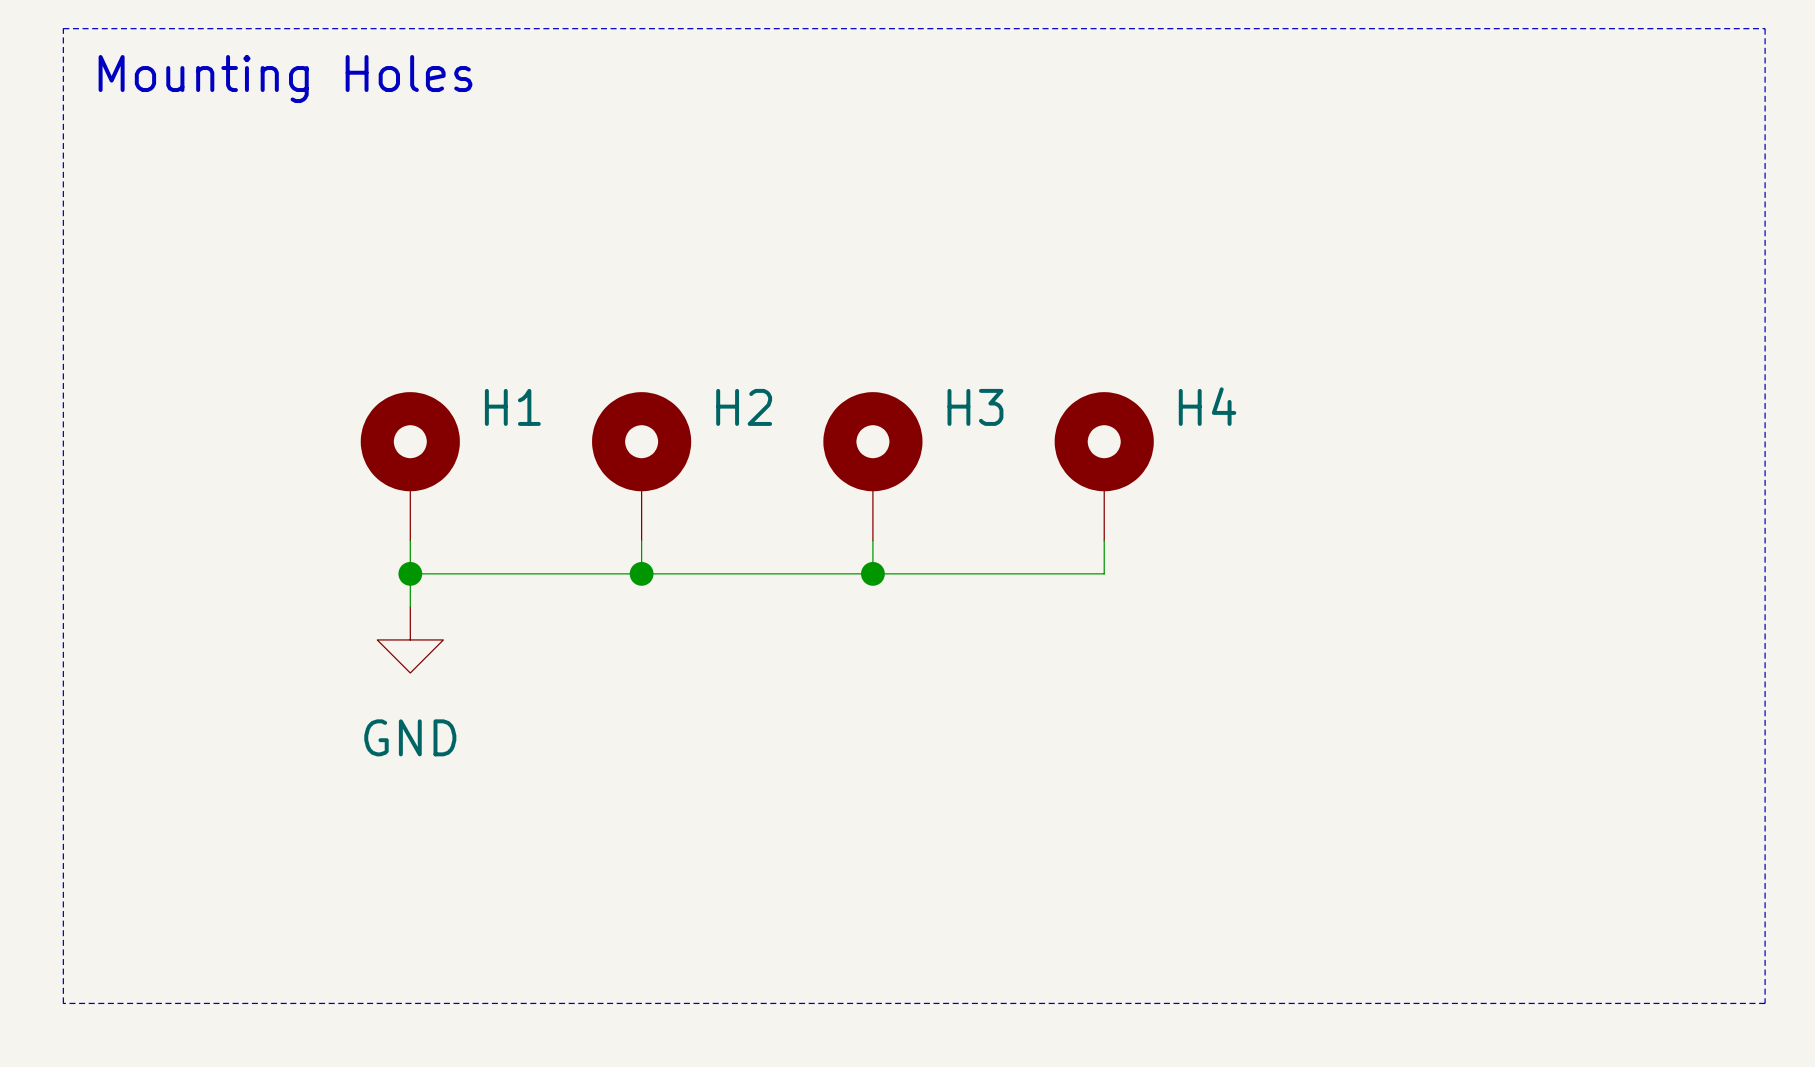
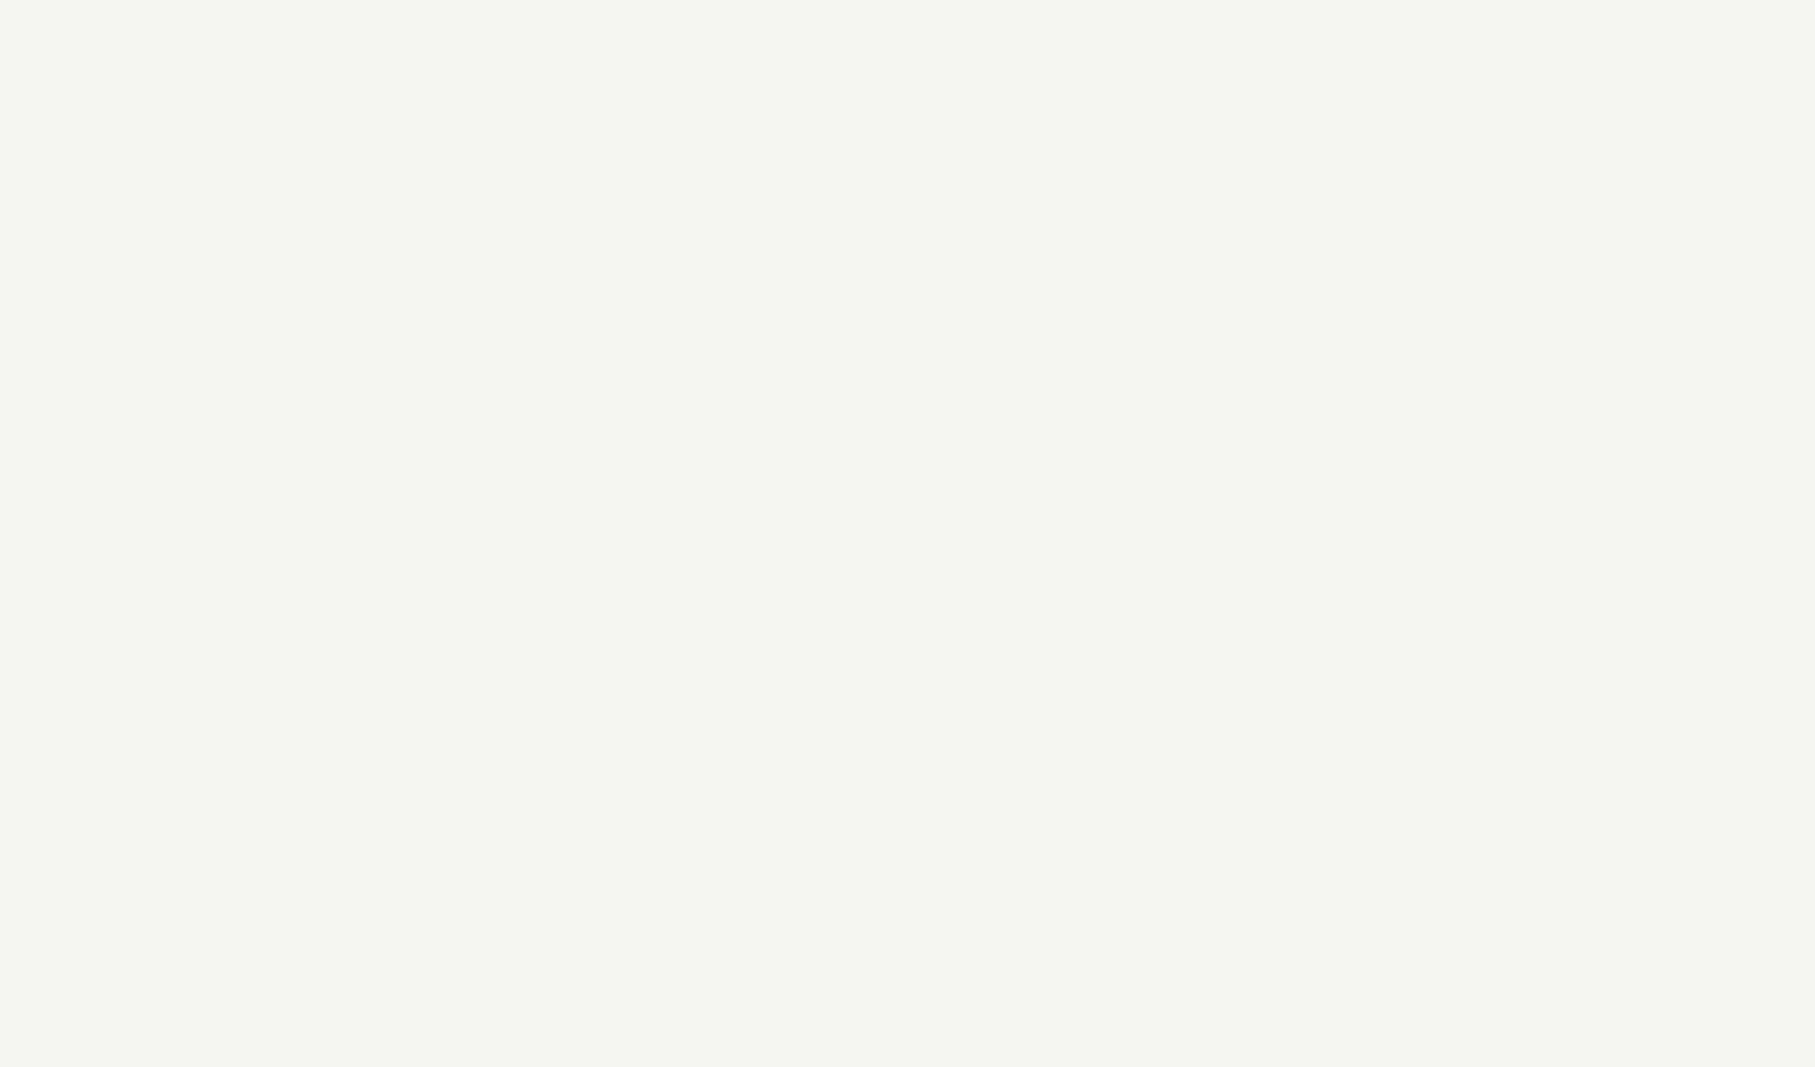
line: (63, 28) (1765, 28) (1765, 1003) (63, 1003) (63, 28) -> none
text: Mounting Holes (285, 79) -> none
H1: (410, 466) -> none
H2: (641, 466) -> none
H3: (872, 466) -> none
H4: (1104, 466) -> none
wire: (410, 540) (410, 606) -> none
wire: (641, 540) (641, 573) -> none
wire: (872, 540) (872, 573) -> none
wire: (1104, 540) (1104, 573) (410, 573) -> none
junction: (410, 573) -> none
junction: (641, 573) -> none
junction: (872, 573) -> none
power symbol: GND (410, 639) -> none

